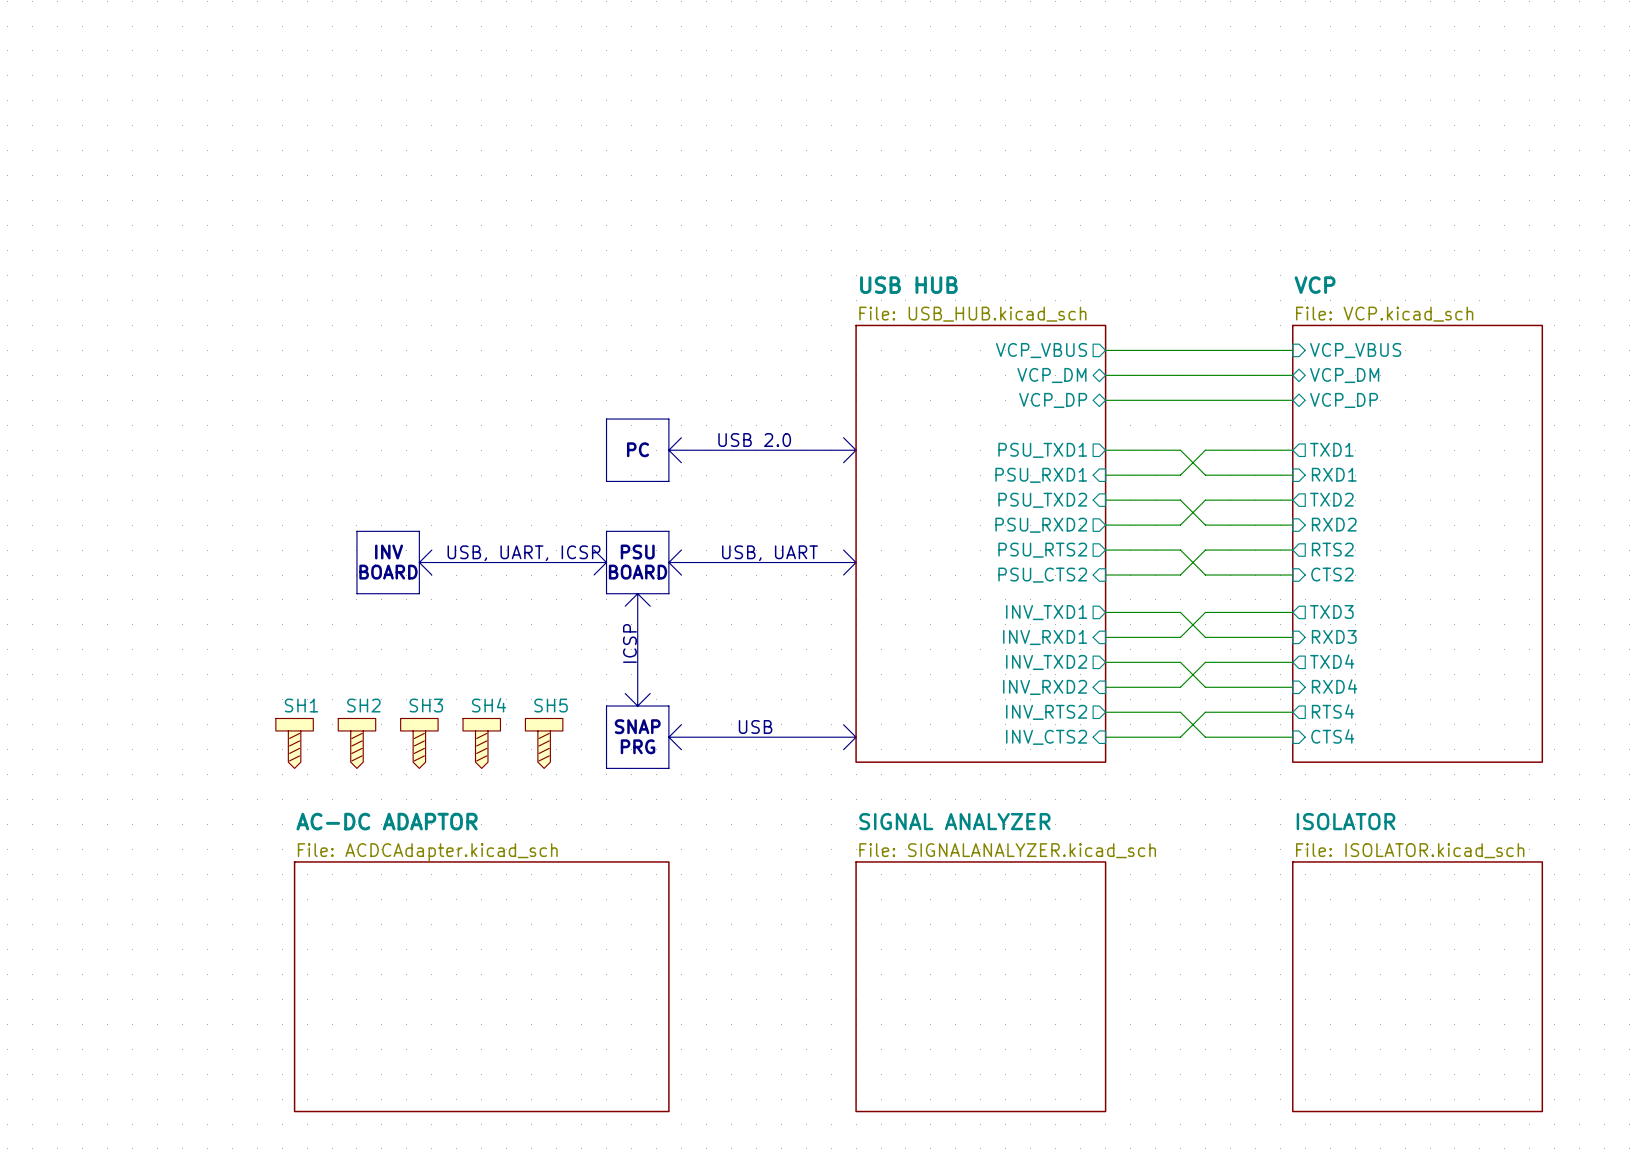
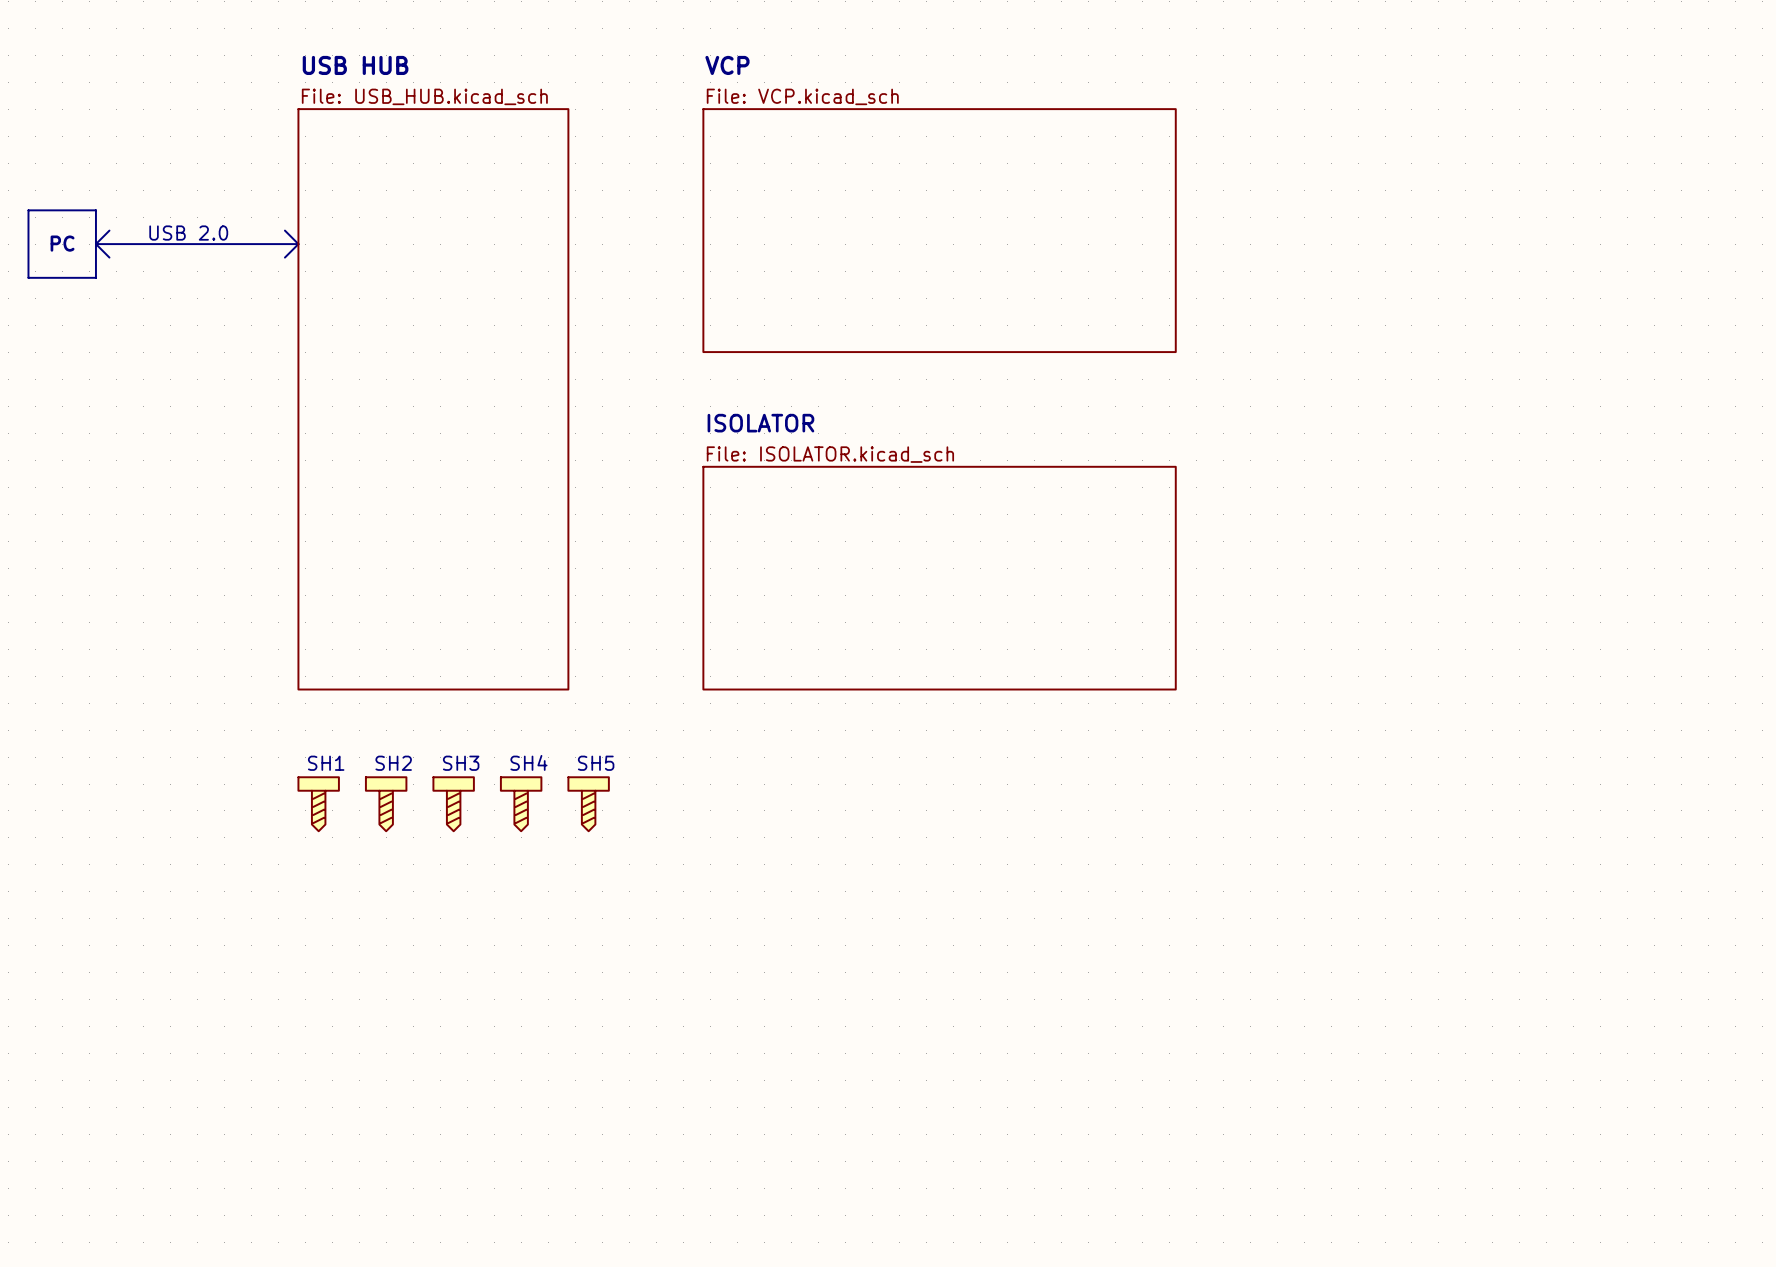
line: none -> (28, 210) (95, 210) (95, 277) (28, 277) (28, 210)
line: none -> (109, 230) (95, 244)
line: none -> (284, 230) (298, 244)
sheet VCP: none -> File: VCP.kicad_sch (939, 230)
text: none -> USB 2.0 (188, 233)
text: none -> PC (62, 243)
line: none -> (95, 244) (109, 257)
line: none -> (95, 244) (298, 244)
line: none -> (298, 244) (284, 257)
sheet pin: VCP_VBUS (1041, 350) -> none
wire: (1105, 350) (1292, 350) -> none
sheet pin: VCP_VBUS (1355, 350) -> none
sheet USB HUB: none -> File: USB_HUB.kicad_sch (433, 399)
sheet pin: VCP_DM (1051, 375) -> none
wire: (1105, 375) (1292, 375) -> none
sheet pin: VCP_DM (1344, 375) -> none
sheet pin: VCP_DP (1053, 400) -> none
wire: (1105, 400) (1292, 400) -> none
sheet pin: VCP_DP (1344, 400) -> none
line: (606, 419) (668, 419) (668, 481) (606, 481) (606, 419) -> none
line: (681, 437) (668, 450) -> none
line: (843, 437) (856, 450) -> none
text: USB 2.0 (754, 440) -> none
text: PC (638, 449) -> none
sheet pin: TXD1 (1331, 449) -> none
line: (668, 450) (681, 462) -> none
line: (668, 450) (856, 450) -> none
line: (856, 450) (843, 462) -> none
sheet pin: PSU_TXD1 (1042, 450) -> none
wire: (1105, 450) (1180, 450) (1205, 475) (1292, 475) -> none
wire: (1292, 450) (1205, 450) (1180, 475) (1105, 475) -> none
sheet pin: RXD1 (1334, 474) -> none
sheet pin: PSU_RXD1 (1041, 475) -> none
sheet pin: TXD2 (1331, 499) -> none
sheet pin: PSU_TXD2 (1042, 500) -> none
wire: (1105, 500) (1180, 500) (1205, 525) (1292, 525) -> none
wire: (1292, 500) (1205, 500) (1180, 525) (1105, 525) -> none
sheet pin: RXD2 (1334, 524) -> none
sheet pin: PSU_RXD2 (1041, 525) -> none
line: (356, 531) (419, 531) (419, 593) (356, 593) (356, 531) -> none
line: (606, 531) (606, 593) (668, 593) (668, 531) (606, 531) -> none
sheet ISOLATOR: none -> File: ISOLATOR.kicad_sch (939, 578)
sheet USB HUB: File: USB_HUB.kicad_sch (980, 543) -> none
sheet VCP: File: VCP.kicad_sch (1417, 543) -> none
sheet pin: RTS2 (1332, 549) -> none
line: (431, 550) (419, 562) -> none
line: (594, 550) (606, 562) -> none
line: (681, 550) (668, 562) -> none
line: (843, 550) (856, 562) -> none
sheet pin: PSU_RTS2 (1042, 550) -> none
wire: (1105, 550) (1180, 550) (1205, 575) (1292, 575) -> none
wire: (1292, 550) (1205, 550) (1180, 575) (1105, 575) -> none
text: INV (389, 552) -> none
text: PSU (637, 552) -> none
text: USB, UART, ICSP (524, 553) -> none
text: USB, UART (770, 553) -> none
line: (419, 562) (606, 562) -> none
line: (419, 562) (431, 575) -> none
line: (606, 562) (594, 575) -> none
line: (668, 562) (856, 562) -> none
line: (668, 562) (681, 575) -> none
line: (856, 562) (843, 575) -> none
text: BOARD (388, 572) -> none
text: BOARD (638, 572) -> none
sheet pin: CTS2 (1332, 574) -> none
sheet pin: PSU_CTS2 (1042, 575) -> none
line: (637, 593) (637, 706) -> none
line: (637, 593) (650, 606) -> none
line: (637, 593) (625, 606) -> none
sheet pin: TXD3 (1331, 611) -> none
sheet pin: INV_TXD1 (1046, 612) -> none
wire: (1105, 612) (1180, 612) (1205, 637) (1292, 637) -> none
wire: (1292, 612) (1205, 612) (1180, 637) (1105, 637) -> none
sheet pin: RXD3 (1334, 636) -> none
sheet pin: INV_RXD1 (1045, 637) -> none
text: ICSP (629, 643) -> none
sheet pin: TXD4 (1332, 661) -> none
sheet pin: INV_TXD2 (1046, 662) -> none
wire: (1105, 662) (1180, 662) (1205, 687) (1292, 687) -> none
wire: (1292, 662) (1205, 662) (1180, 687) (1105, 687) -> none
sheet pin: RXD4 (1334, 686) -> none
sheet pin: INV_RXD2 (1045, 687) -> none
line: (625, 693) (637, 706) -> none
line: (650, 693) (637, 706) -> none
line: (606, 706) (606, 768) (668, 768) (668, 706) (606, 706) -> none
sheet pin: RTS4 (1333, 711) -> none
sheet pin: INV_RTS2 (1046, 712) -> none
wire: (1105, 712) (1180, 712) (1205, 737) (1292, 737) -> none
wire: (1292, 712) (1205, 712) (1180, 737) (1105, 737) -> none
line: (681, 724) (668, 737) -> none
line: (843, 724) (856, 737) -> none
text: SNAP (637, 726) -> none
text: USB (755, 726) -> none
sheet pin: CTS4 (1332, 736) -> none
line: (668, 737) (681, 749) -> none
line: (668, 737) (856, 737) -> none
line: (856, 737) (843, 749) -> none
sheet pin: INV_CTS2 (1046, 737) -> none
text: PRG (638, 746) -> none
sheet AC-DC ADAPTOR: File: ACDCAdapter.kicad_sch (481, 986) -> none
sheet SIGNAL ANALYZER: File: SIGNALANALYZER.kicad_sch (980, 986) -> none
sheet ISOLATOR: File: ISOLATOR.kicad_sch (1417, 986) -> none

